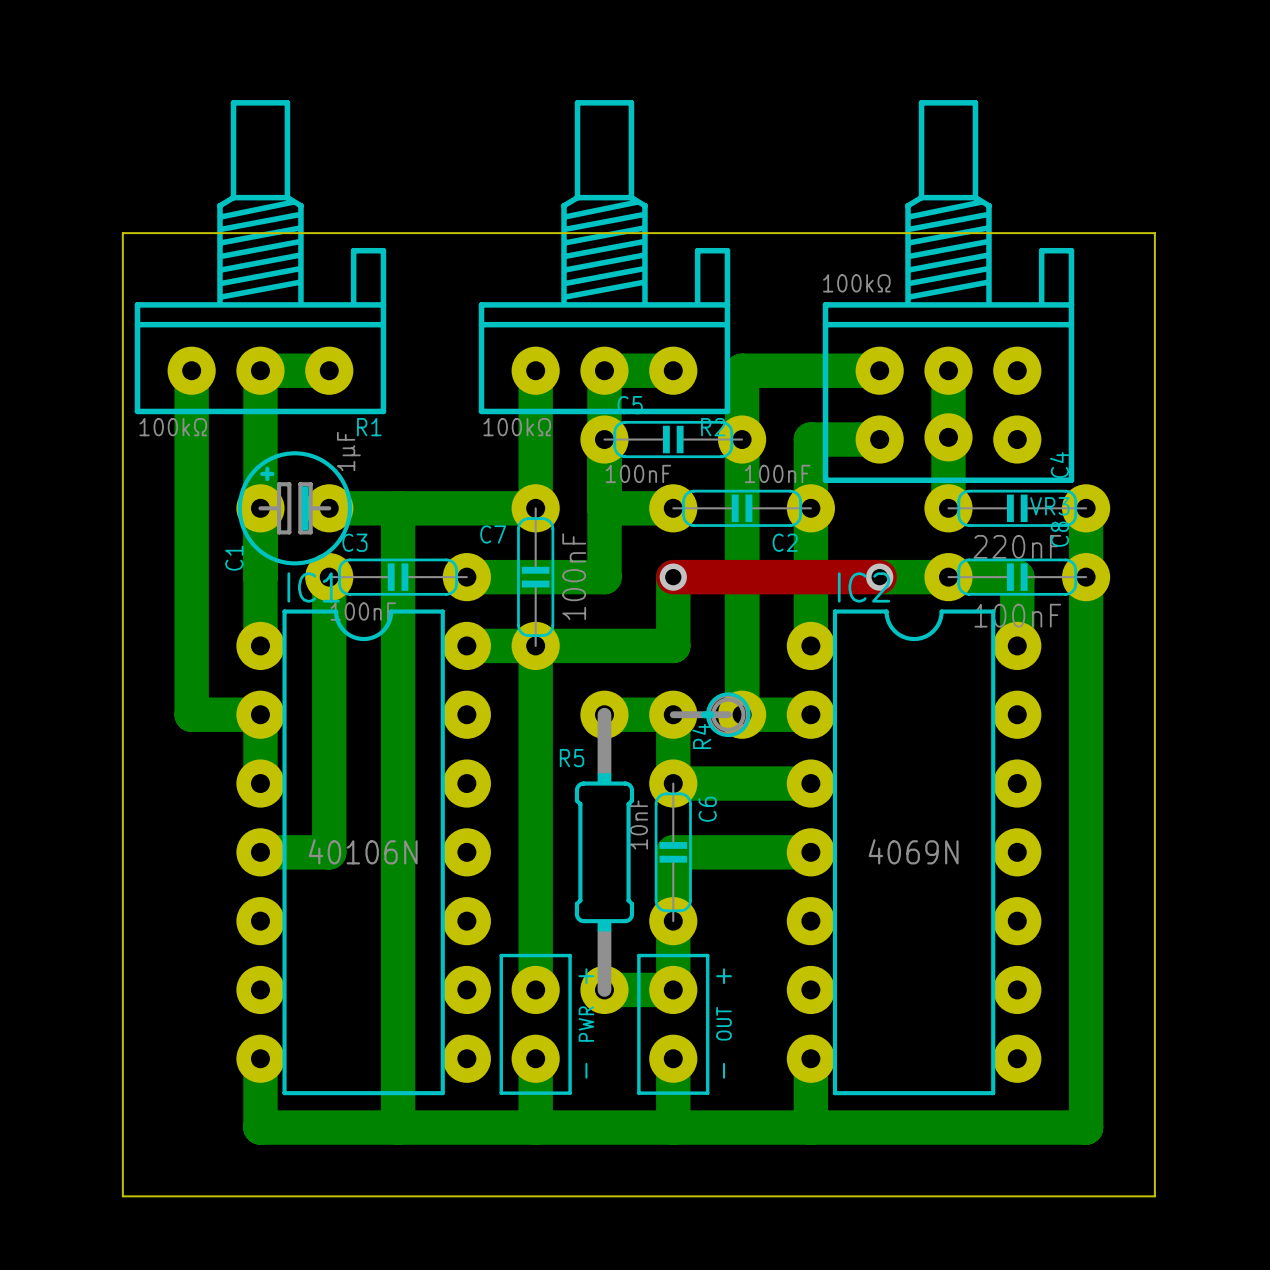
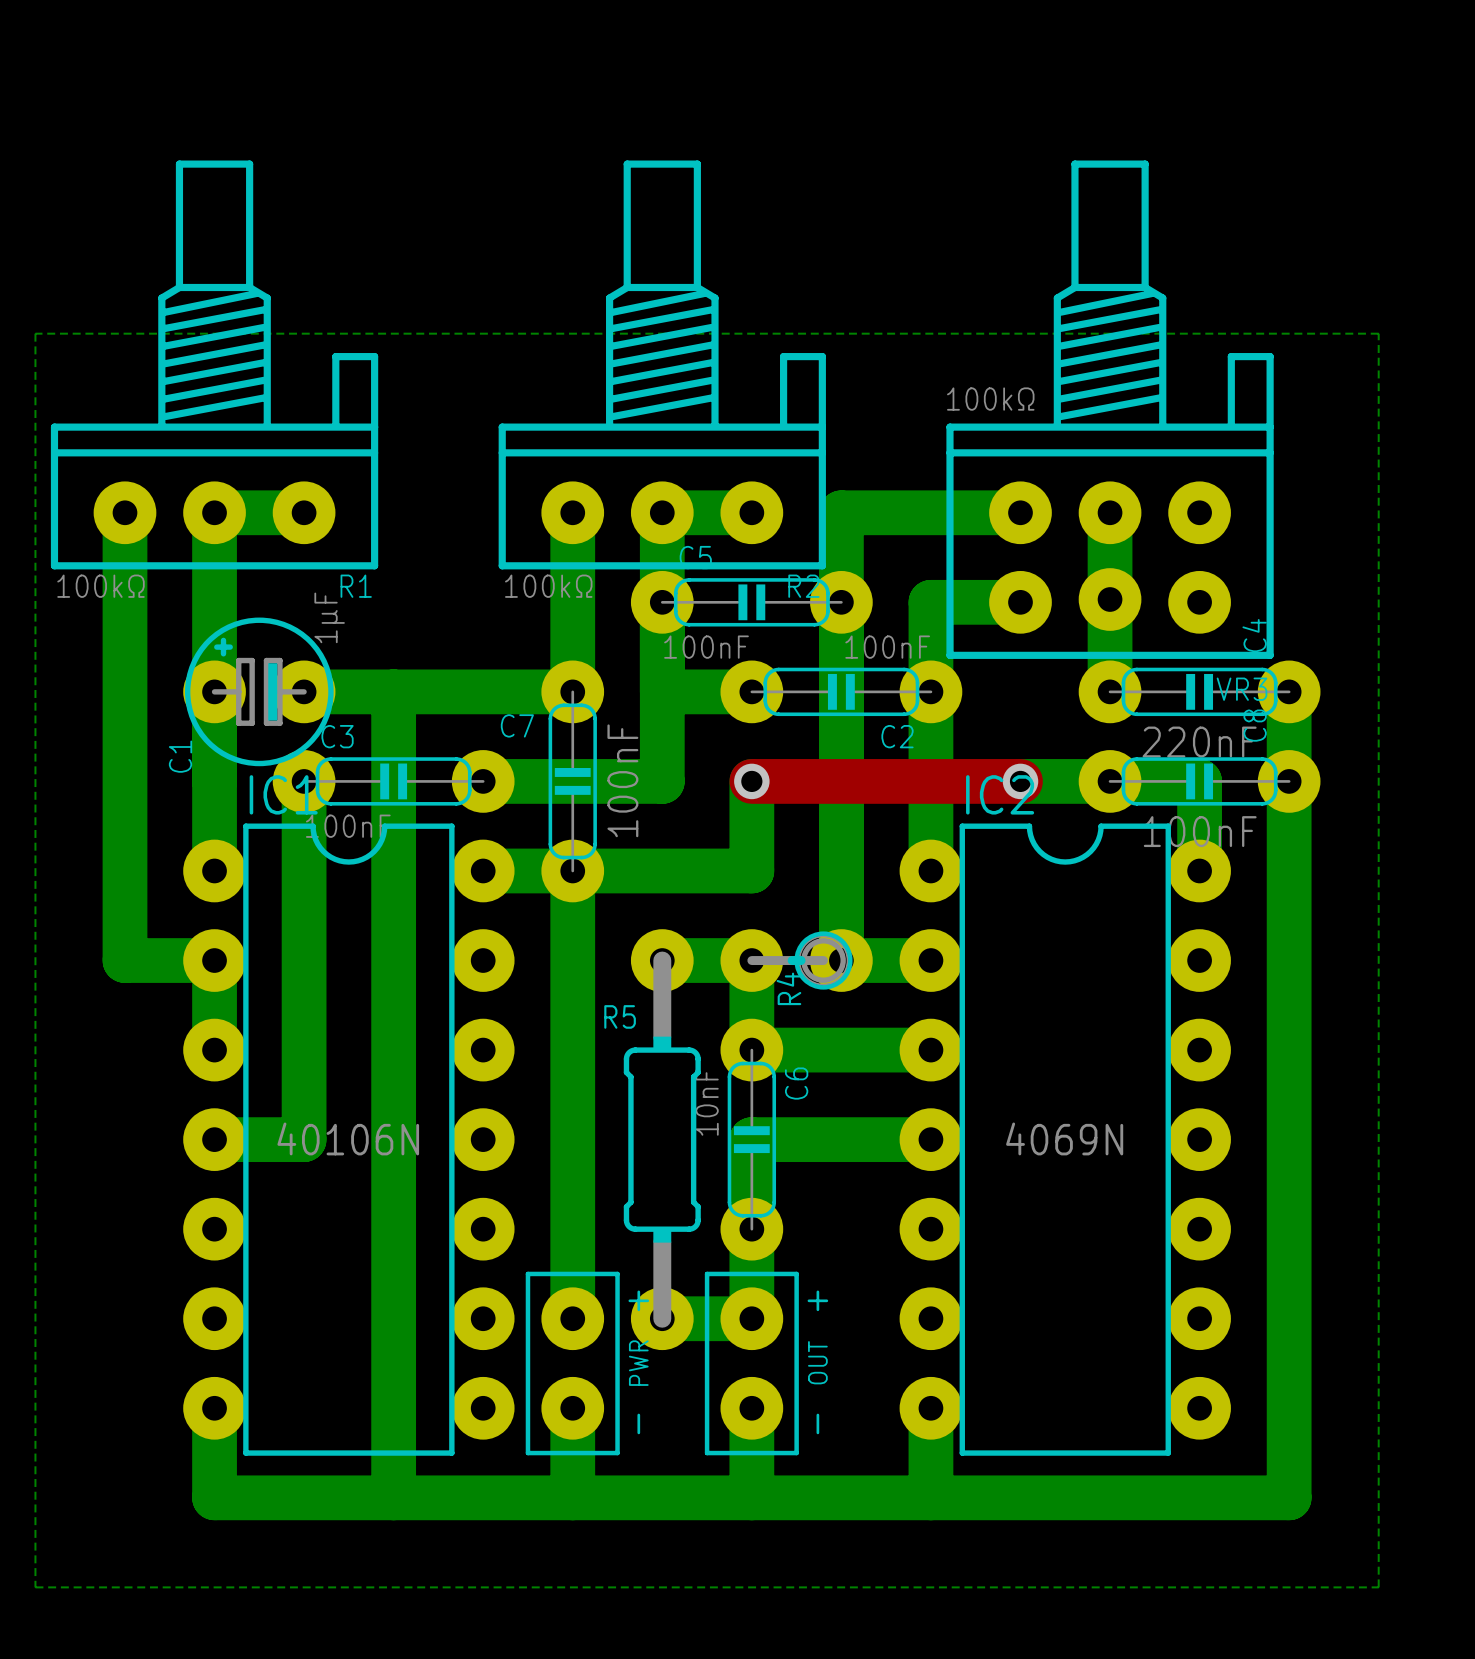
board edge: (122, 233) (1154, 233) (1154, 1196) (122, 1196) (122, 233) -> none
bottom zone outline: none -> (35, 333) (1378, 333) (1378, 1587) (35, 1587) (35, 333)

